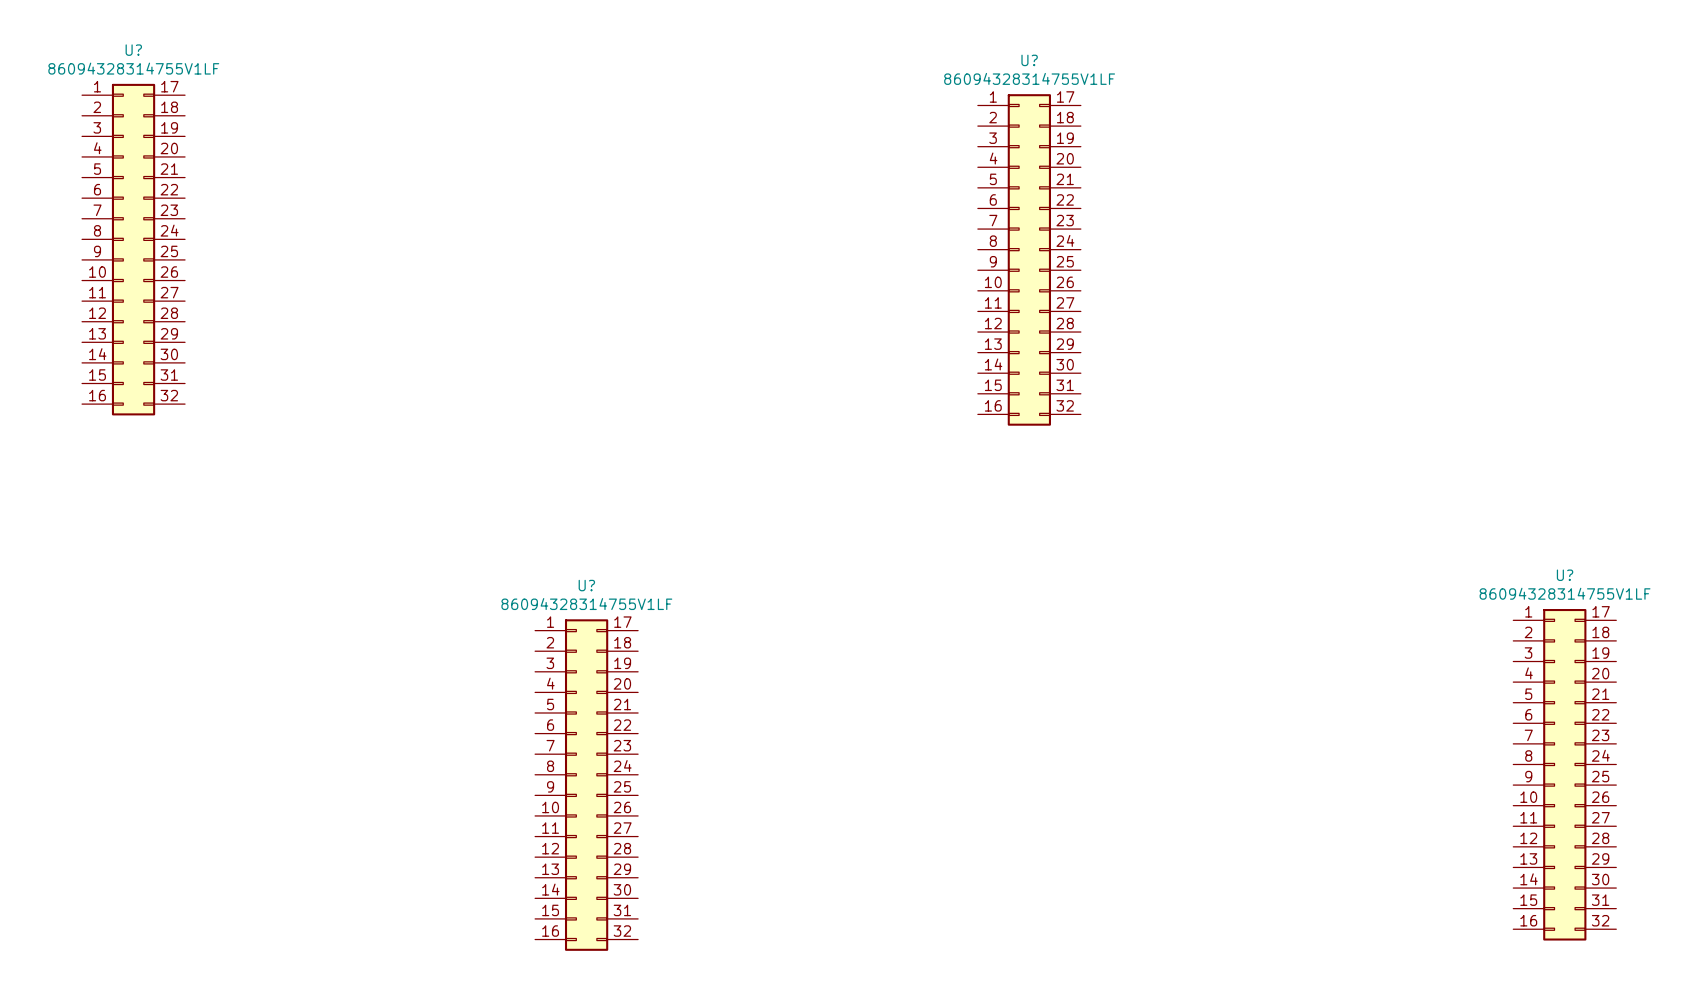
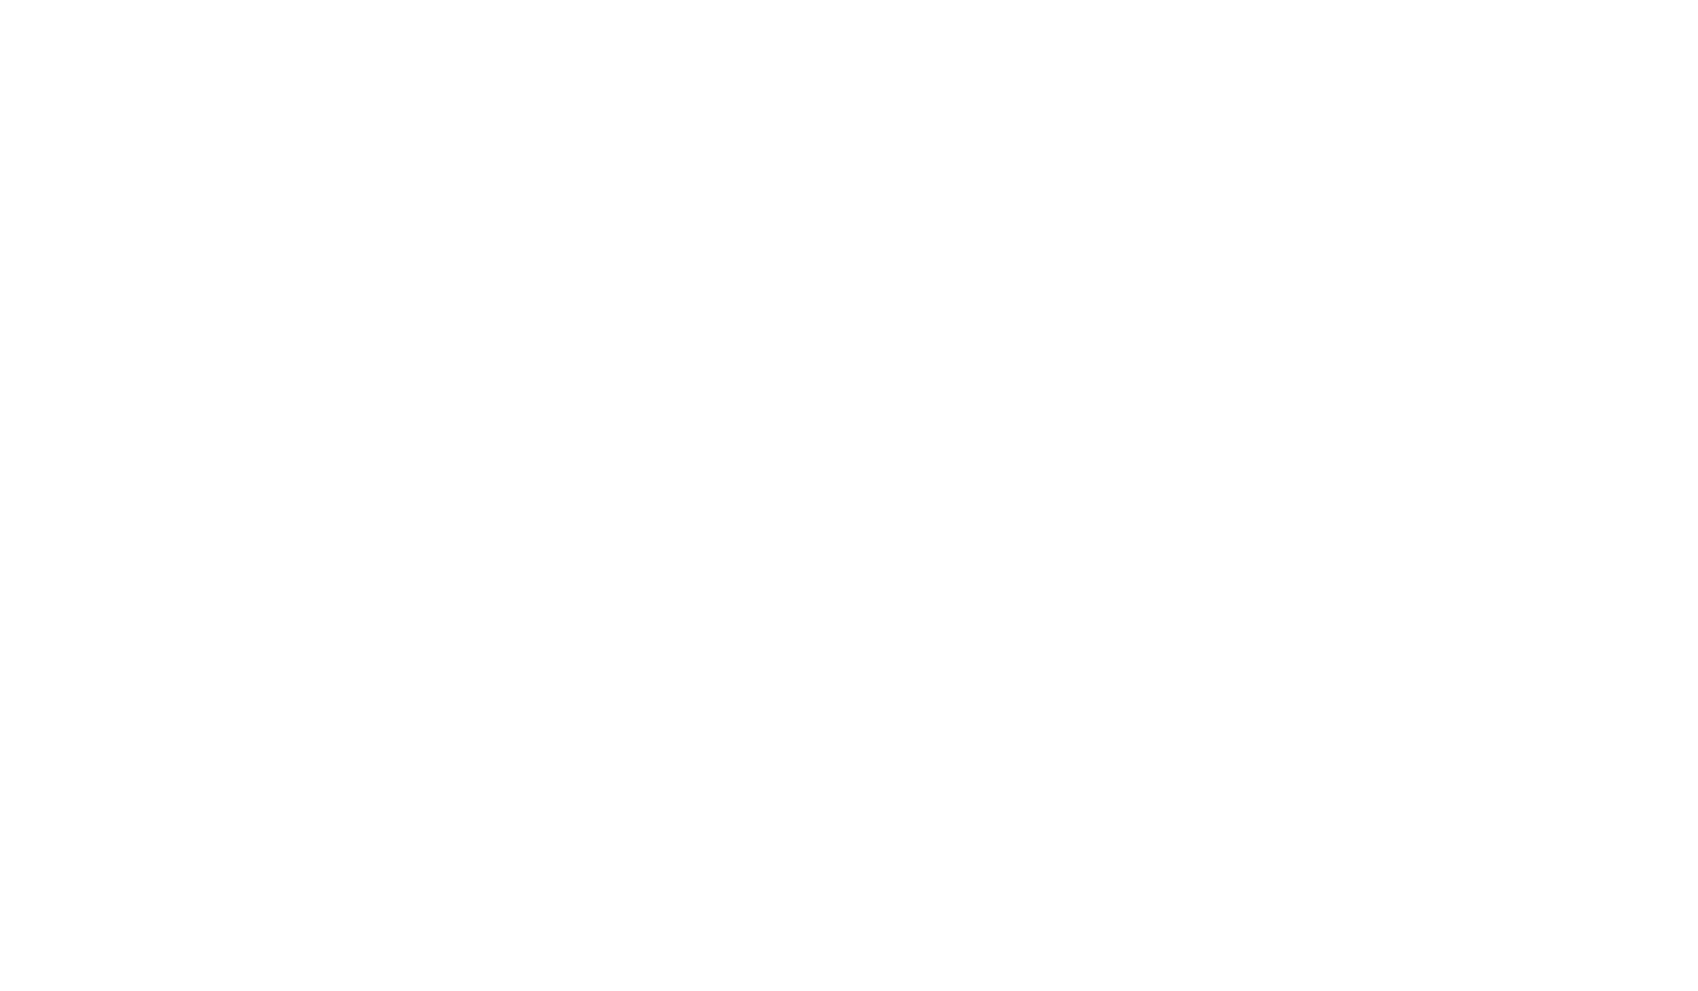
U?: 86094328314755V1LF (133, 249) -> none
U?: 86094328314755V1LF (1029, 259) -> none
U?: 86094328314755V1LF (1564, 774) -> none
U?: 86094328314755V1LF (586, 785) -> none

